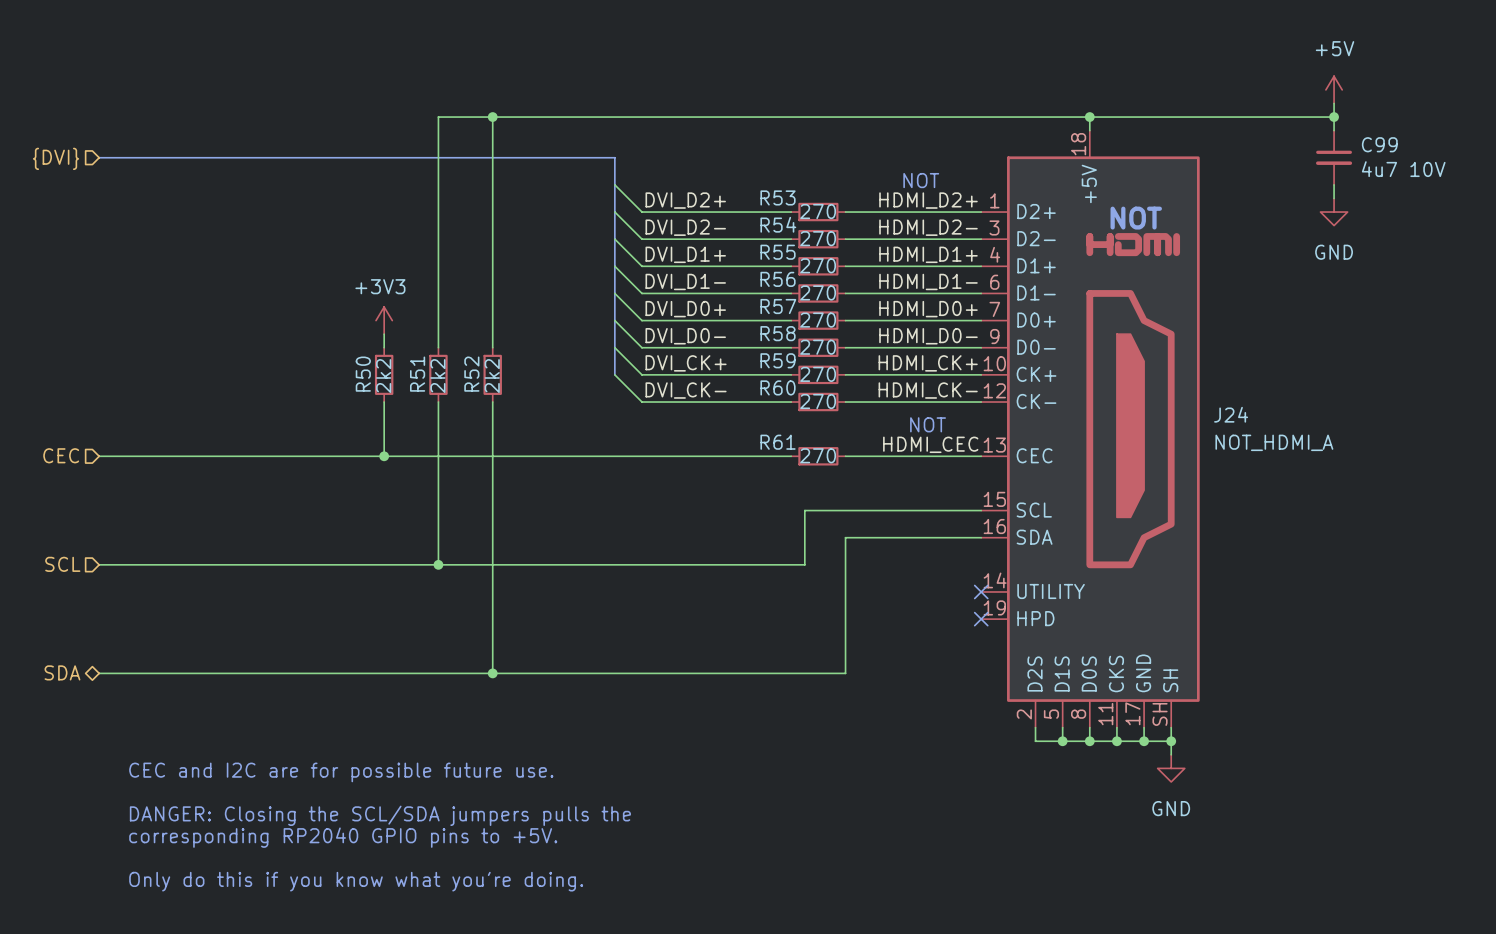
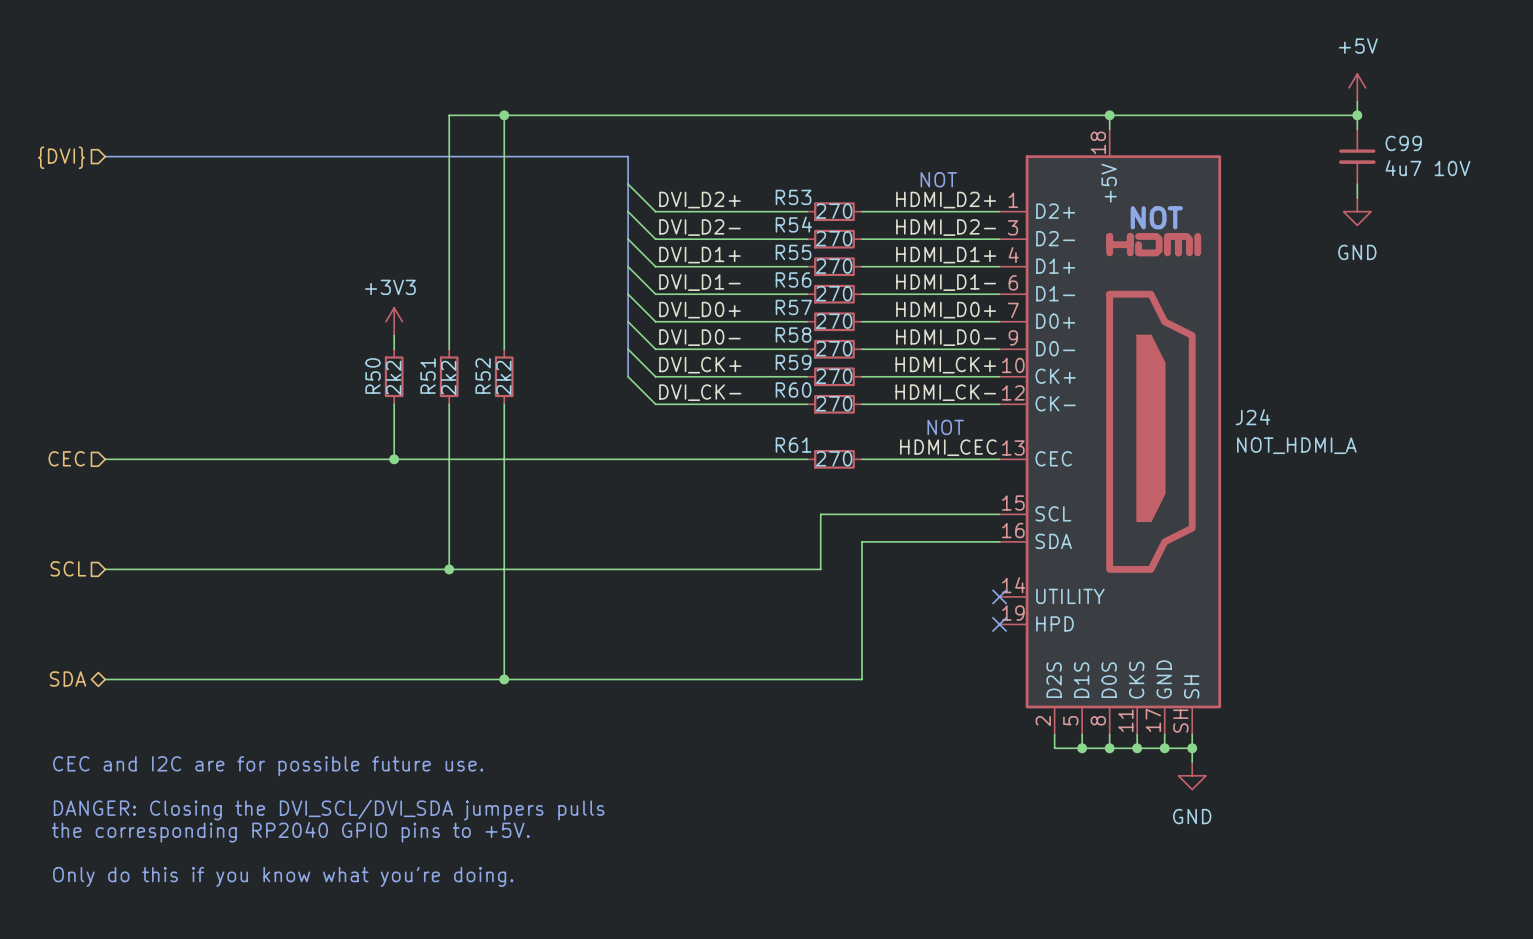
text position: CEC and I2C are for possible future use. (341, 772) -> CEC and I2C are for possible future use. (268, 766)
text: DANGER: Closing the SCL/SDA jumpers pulls the (380, 815) -> DANGER: Closing the DVI_SCL/DVI_SDA jumpers pulls (329, 810)
text: corresponding RP2040 GPIO pins to +5V. (343, 837) -> the corresponding RP2040 GPIO pins to +5V. (290, 832)
text position: Only do this if you know what you're doing. (356, 881) -> Only do this if you know what you're doing. (283, 876)

